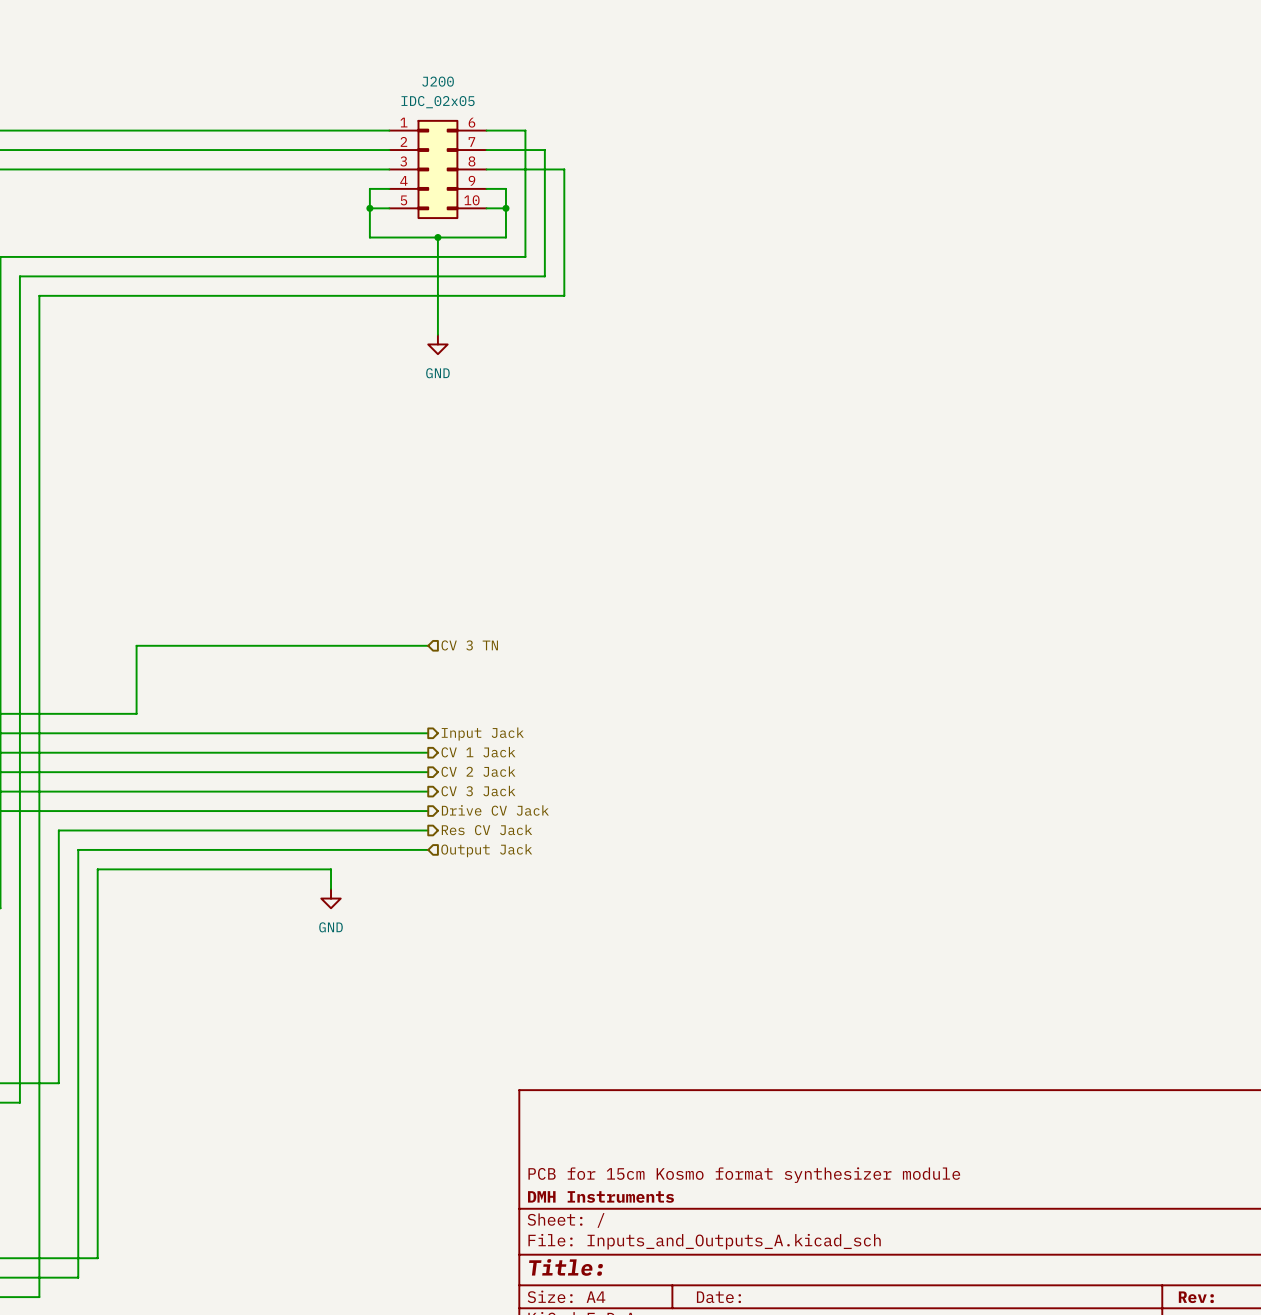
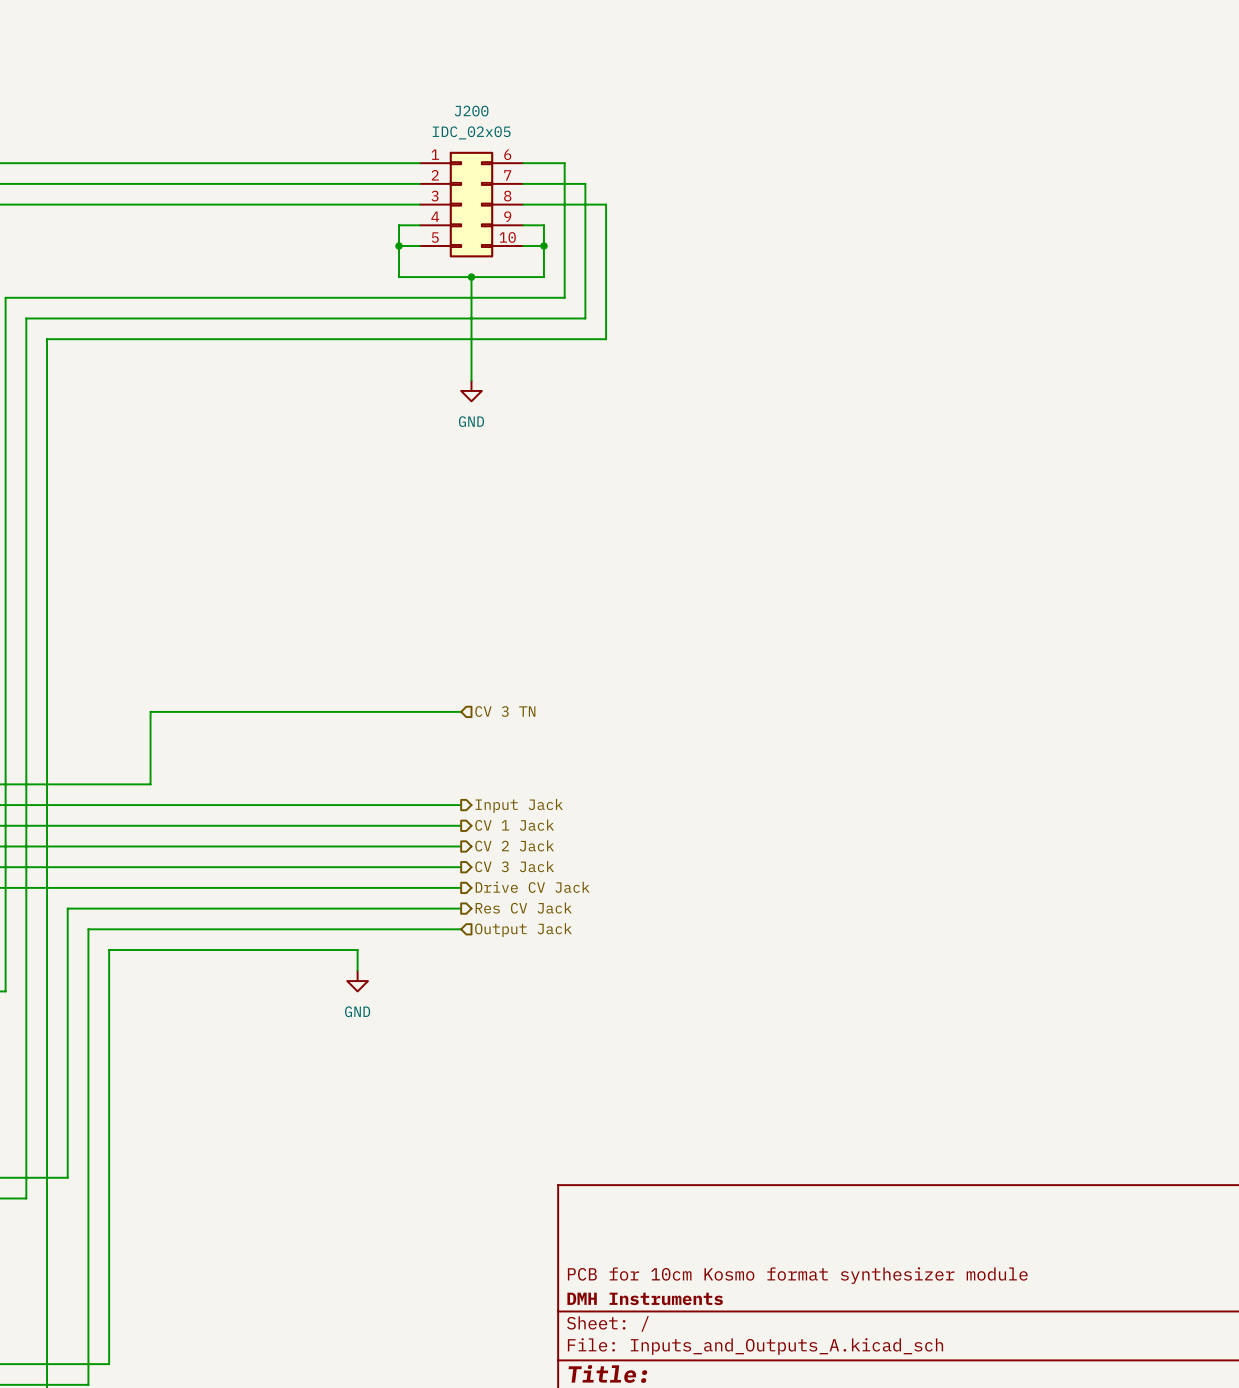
title block: PCB for 15cm Kosmo format synthesizer module (744, 1175) -> PCB for 10cm Kosmo format synthesizer module (797, 1275)

